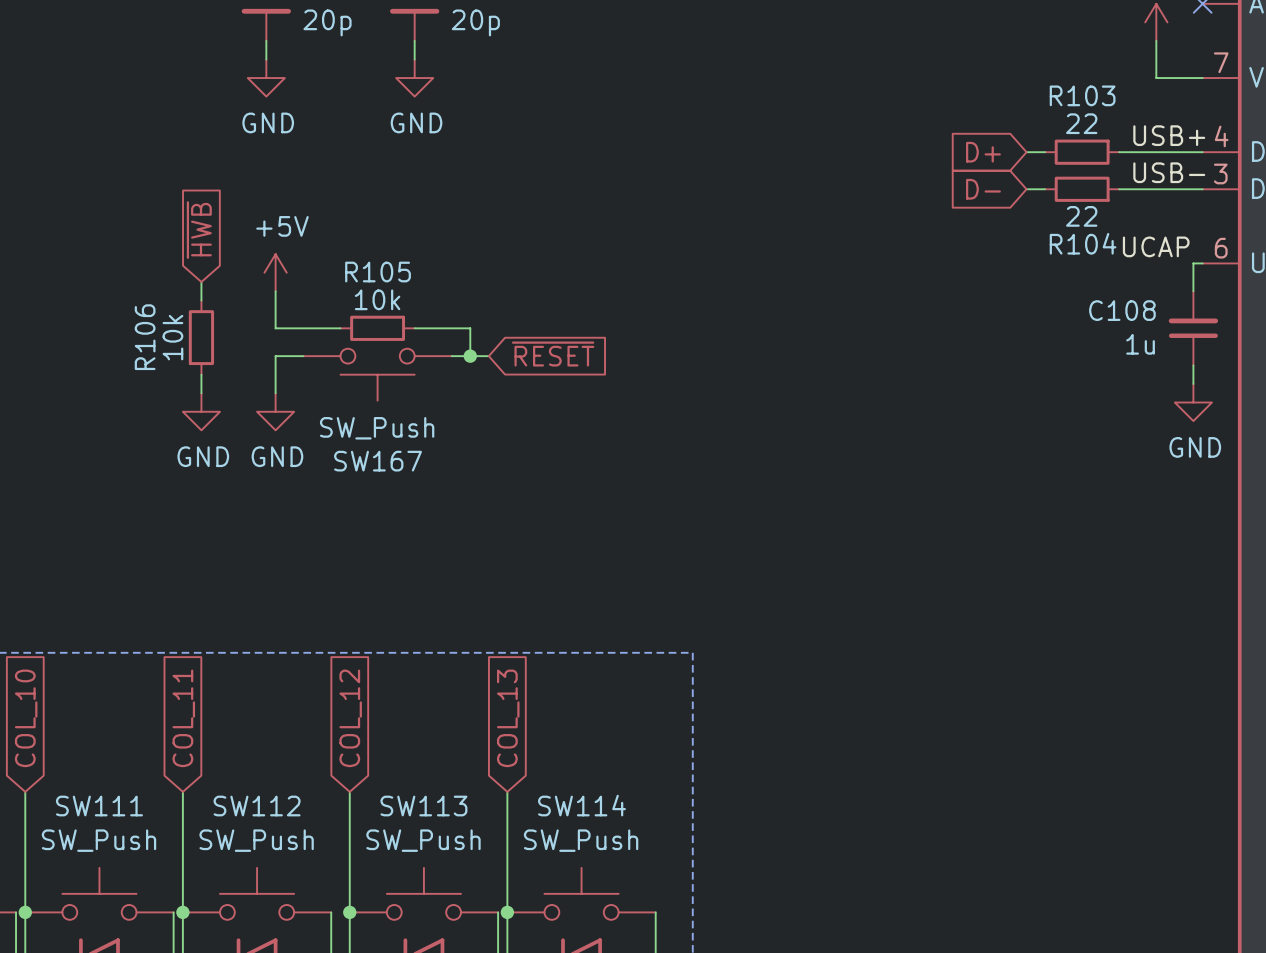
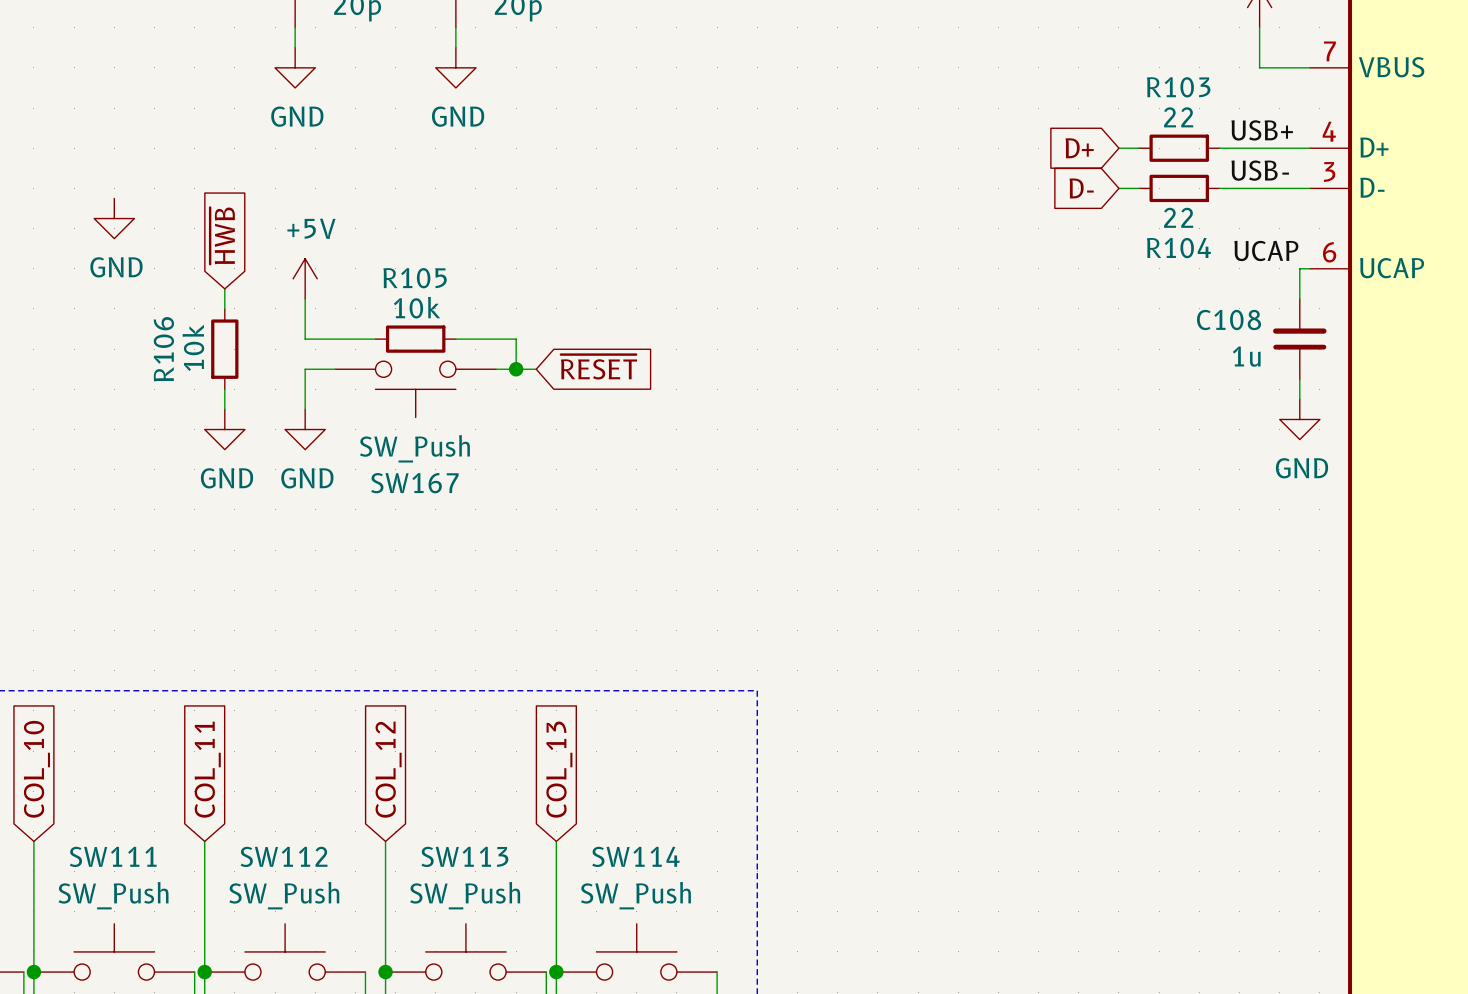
power symbol: none -> GND (114, 218)

